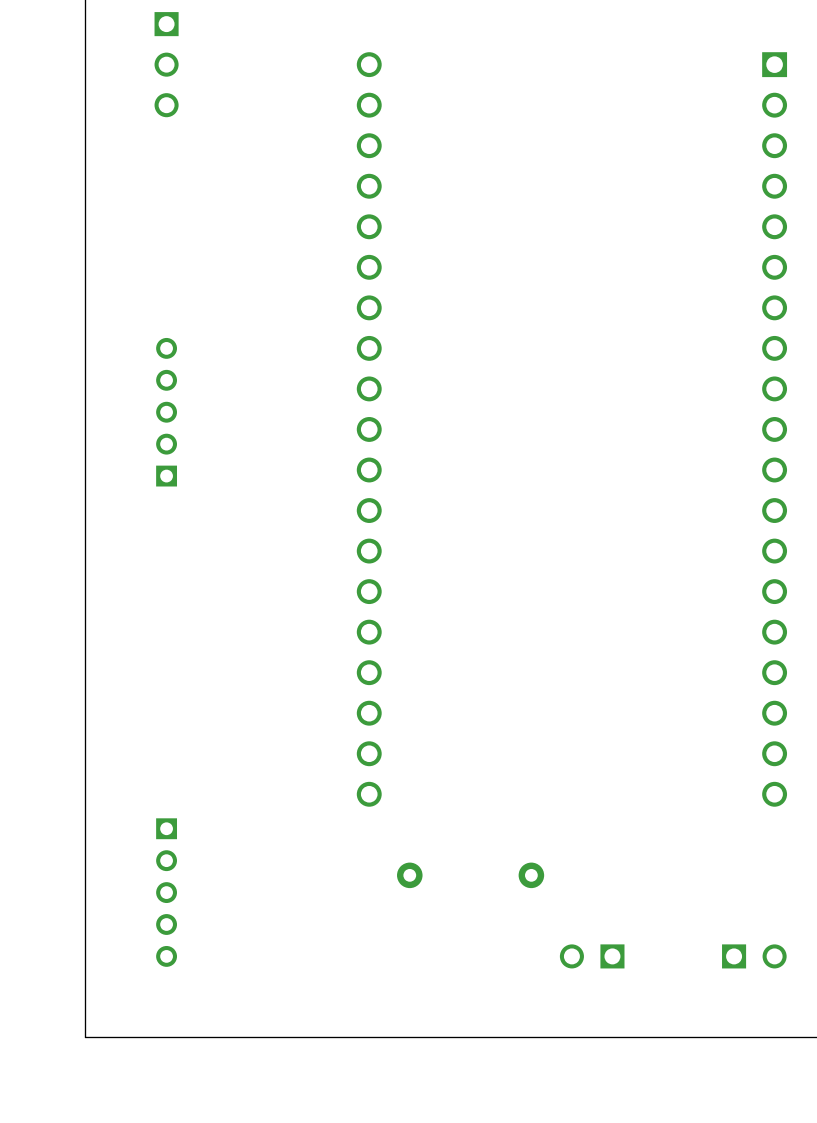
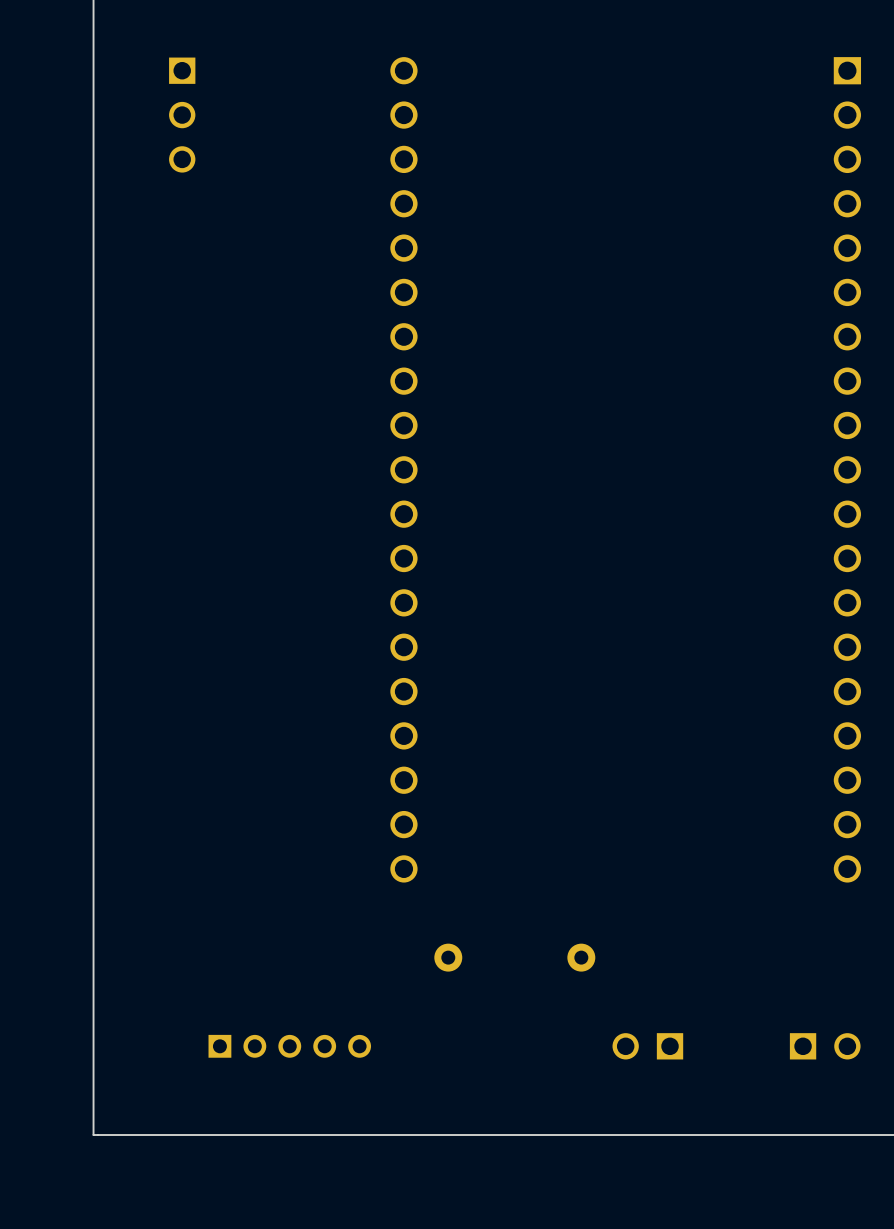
part position: (166, 64) -> (182, 115)
part: (166, 412) -> none
part rotation: 0° (166, 892) -> 90° counterclockwise (289, 1046)
part position: (166, 892) -> (289, 1046)

